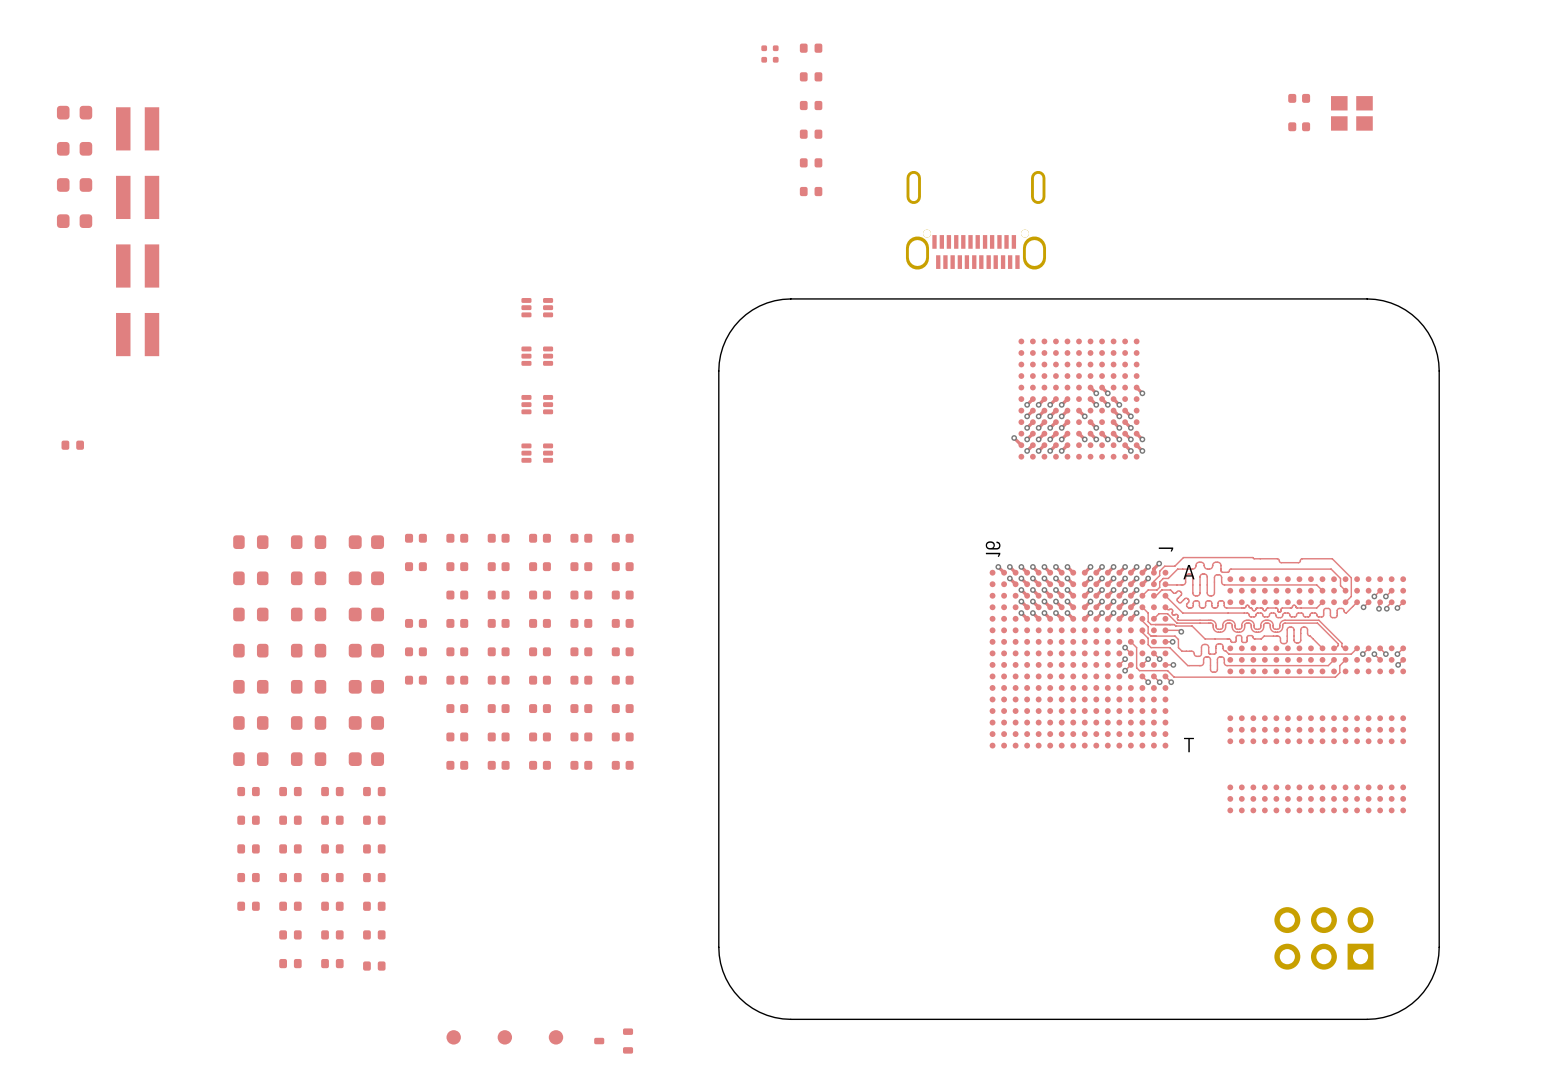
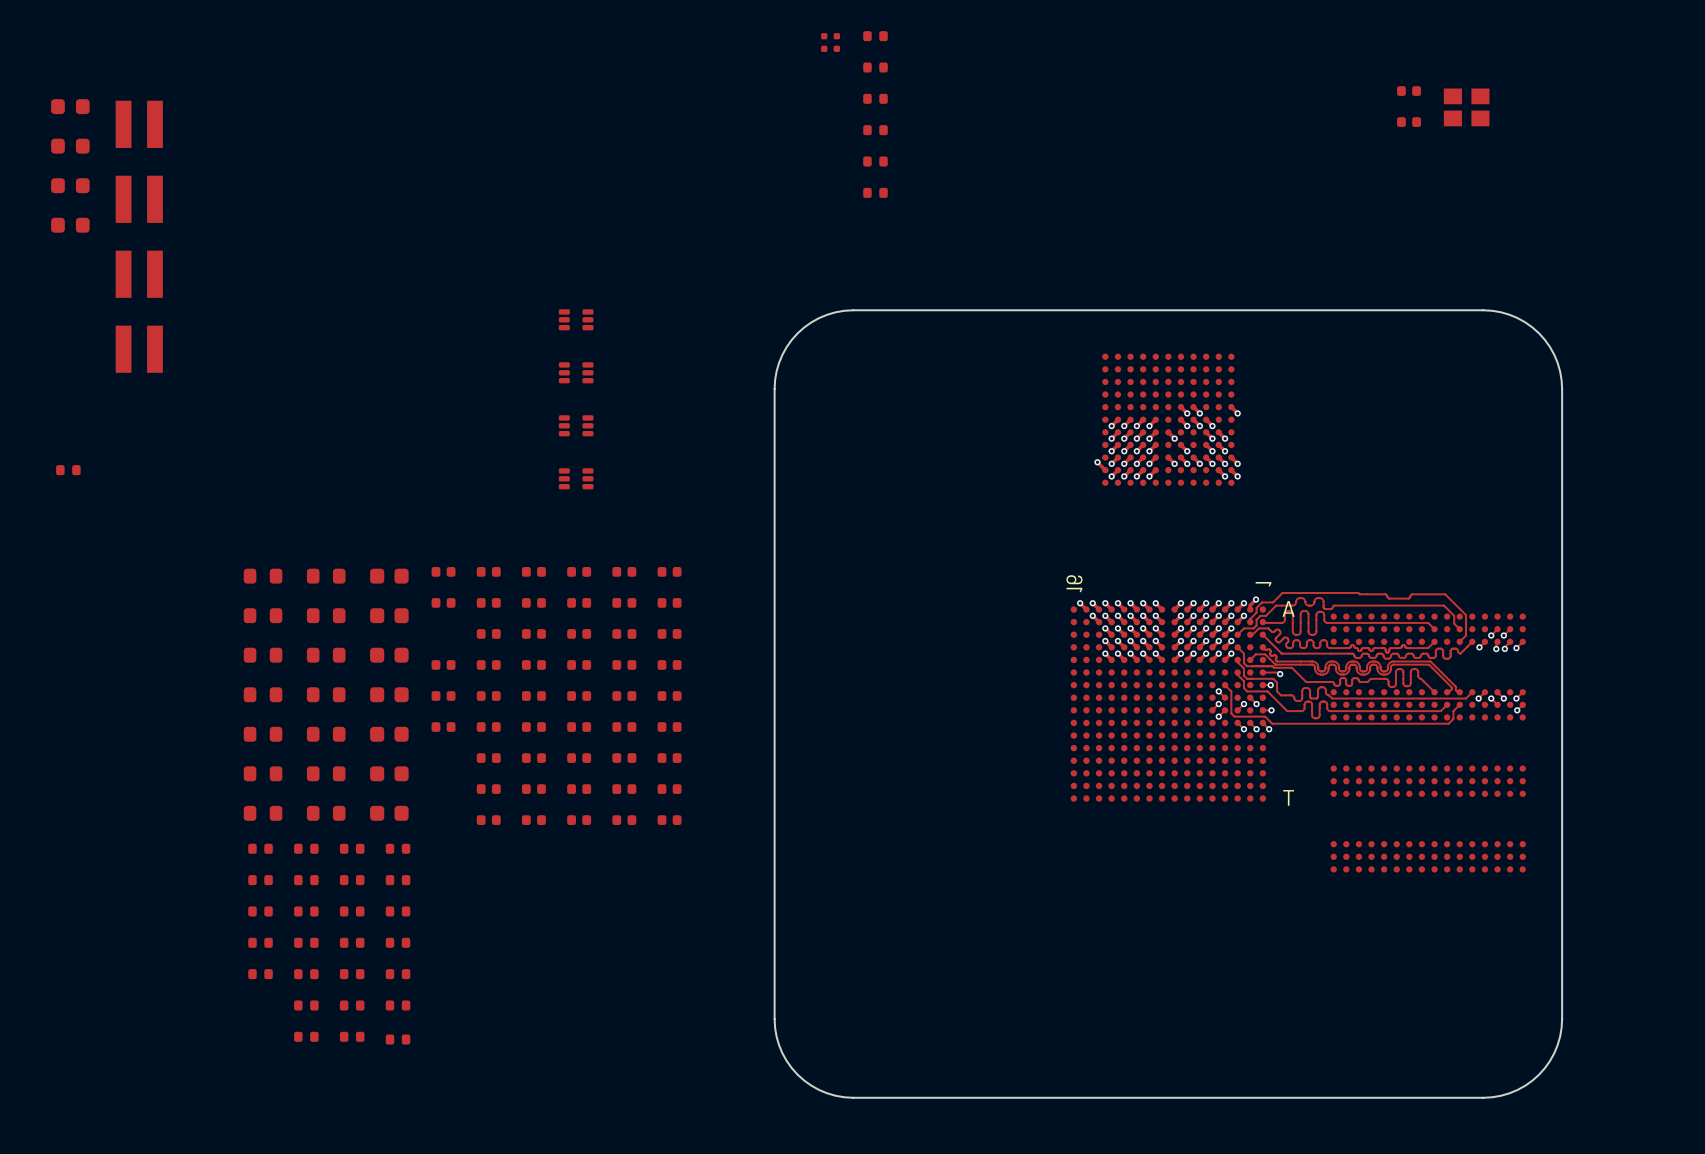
part: (975, 220) -> none
part: (1323, 938) -> none
part: (453, 1037) -> none
part: (504, 1037) -> none
part: (555, 1037) -> none
part: (613, 1041) -> none

